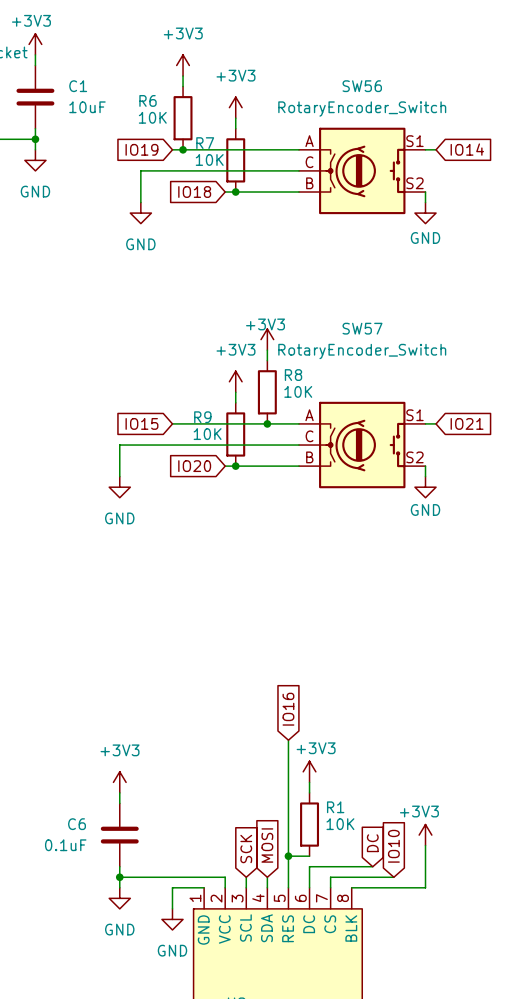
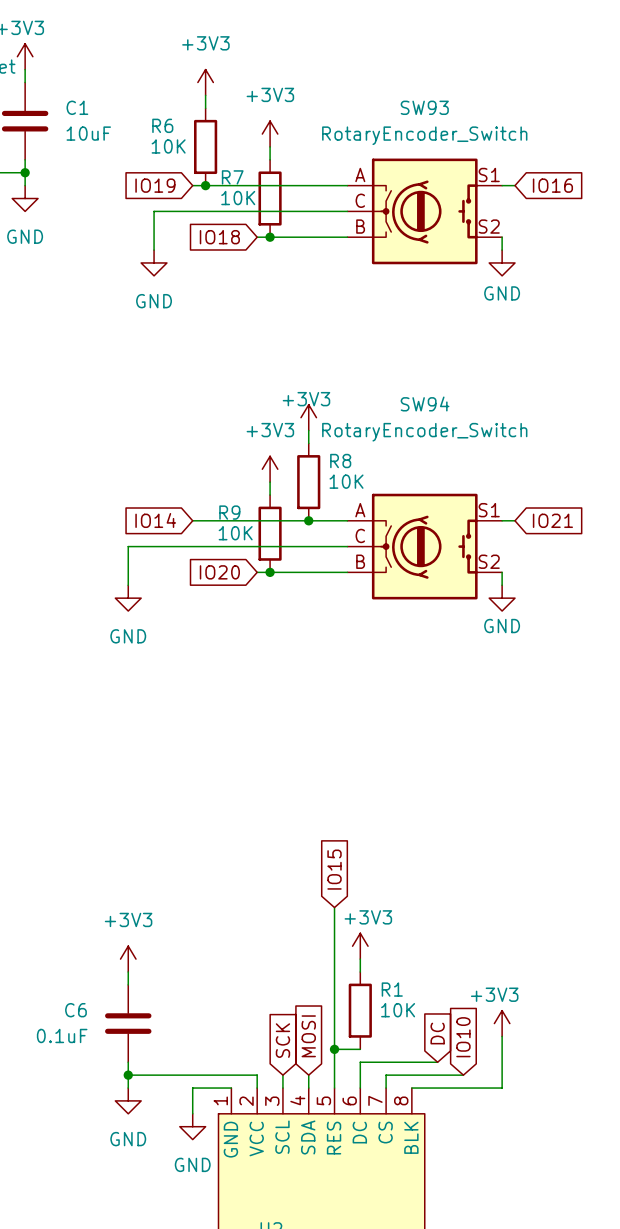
SW56 name: SW56 (362, 86) -> SW93 (424, 107)
global label: IO14 (467, 149) -> IO16 (552, 185)
SW57 name: SW57 (362, 328) -> SW94 (425, 403)
global label: IO15 (141, 423) -> IO14 (155, 520)
global label: IO16 (288, 709) -> IO15 (334, 869)

